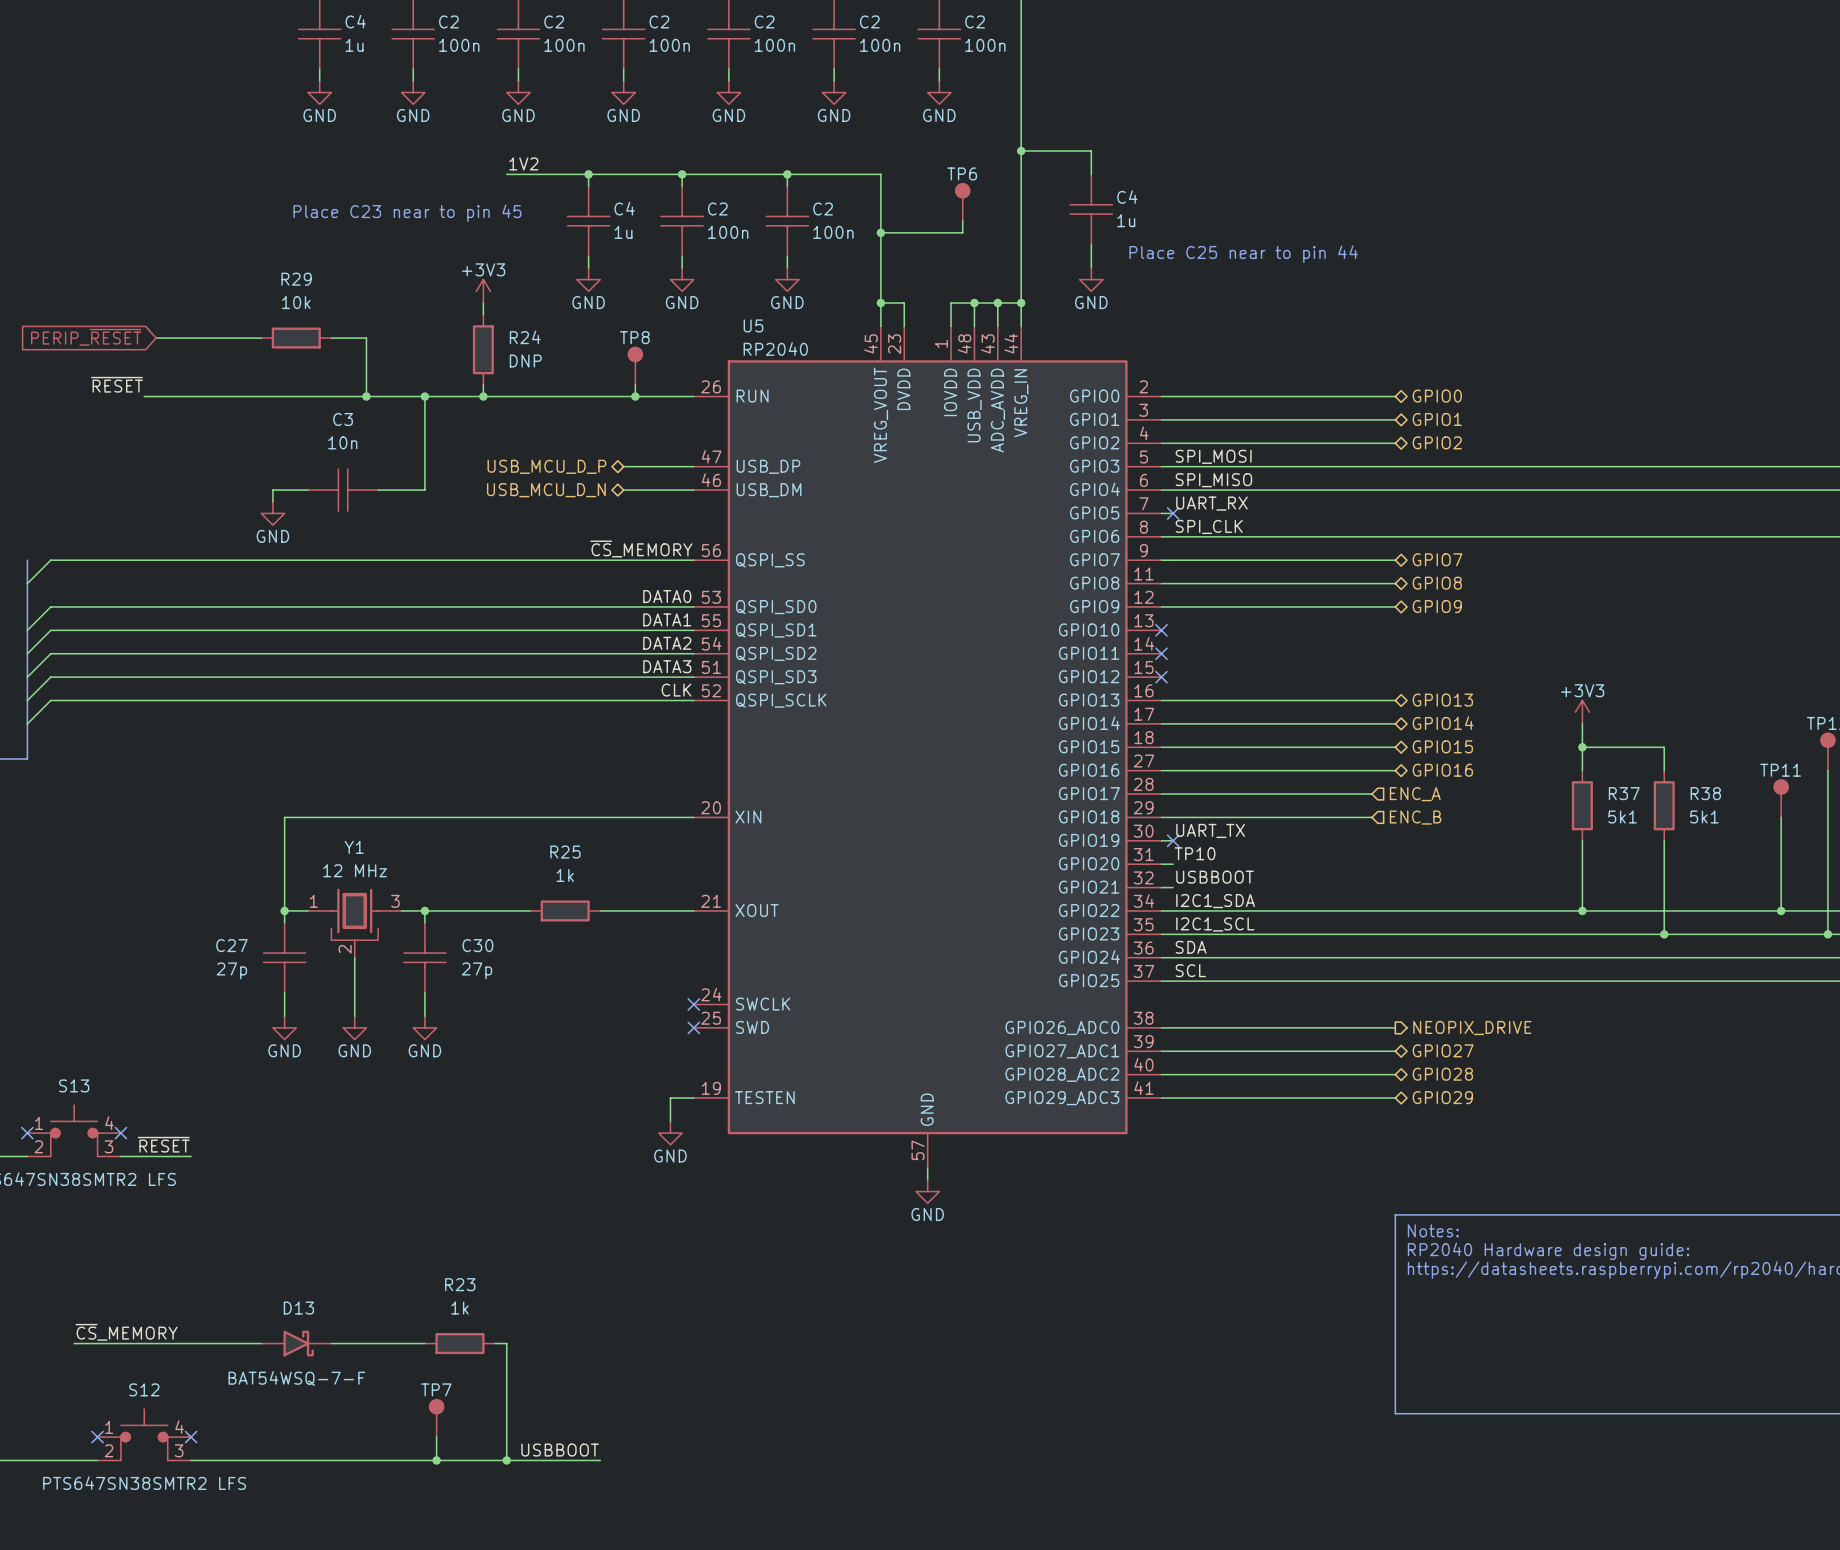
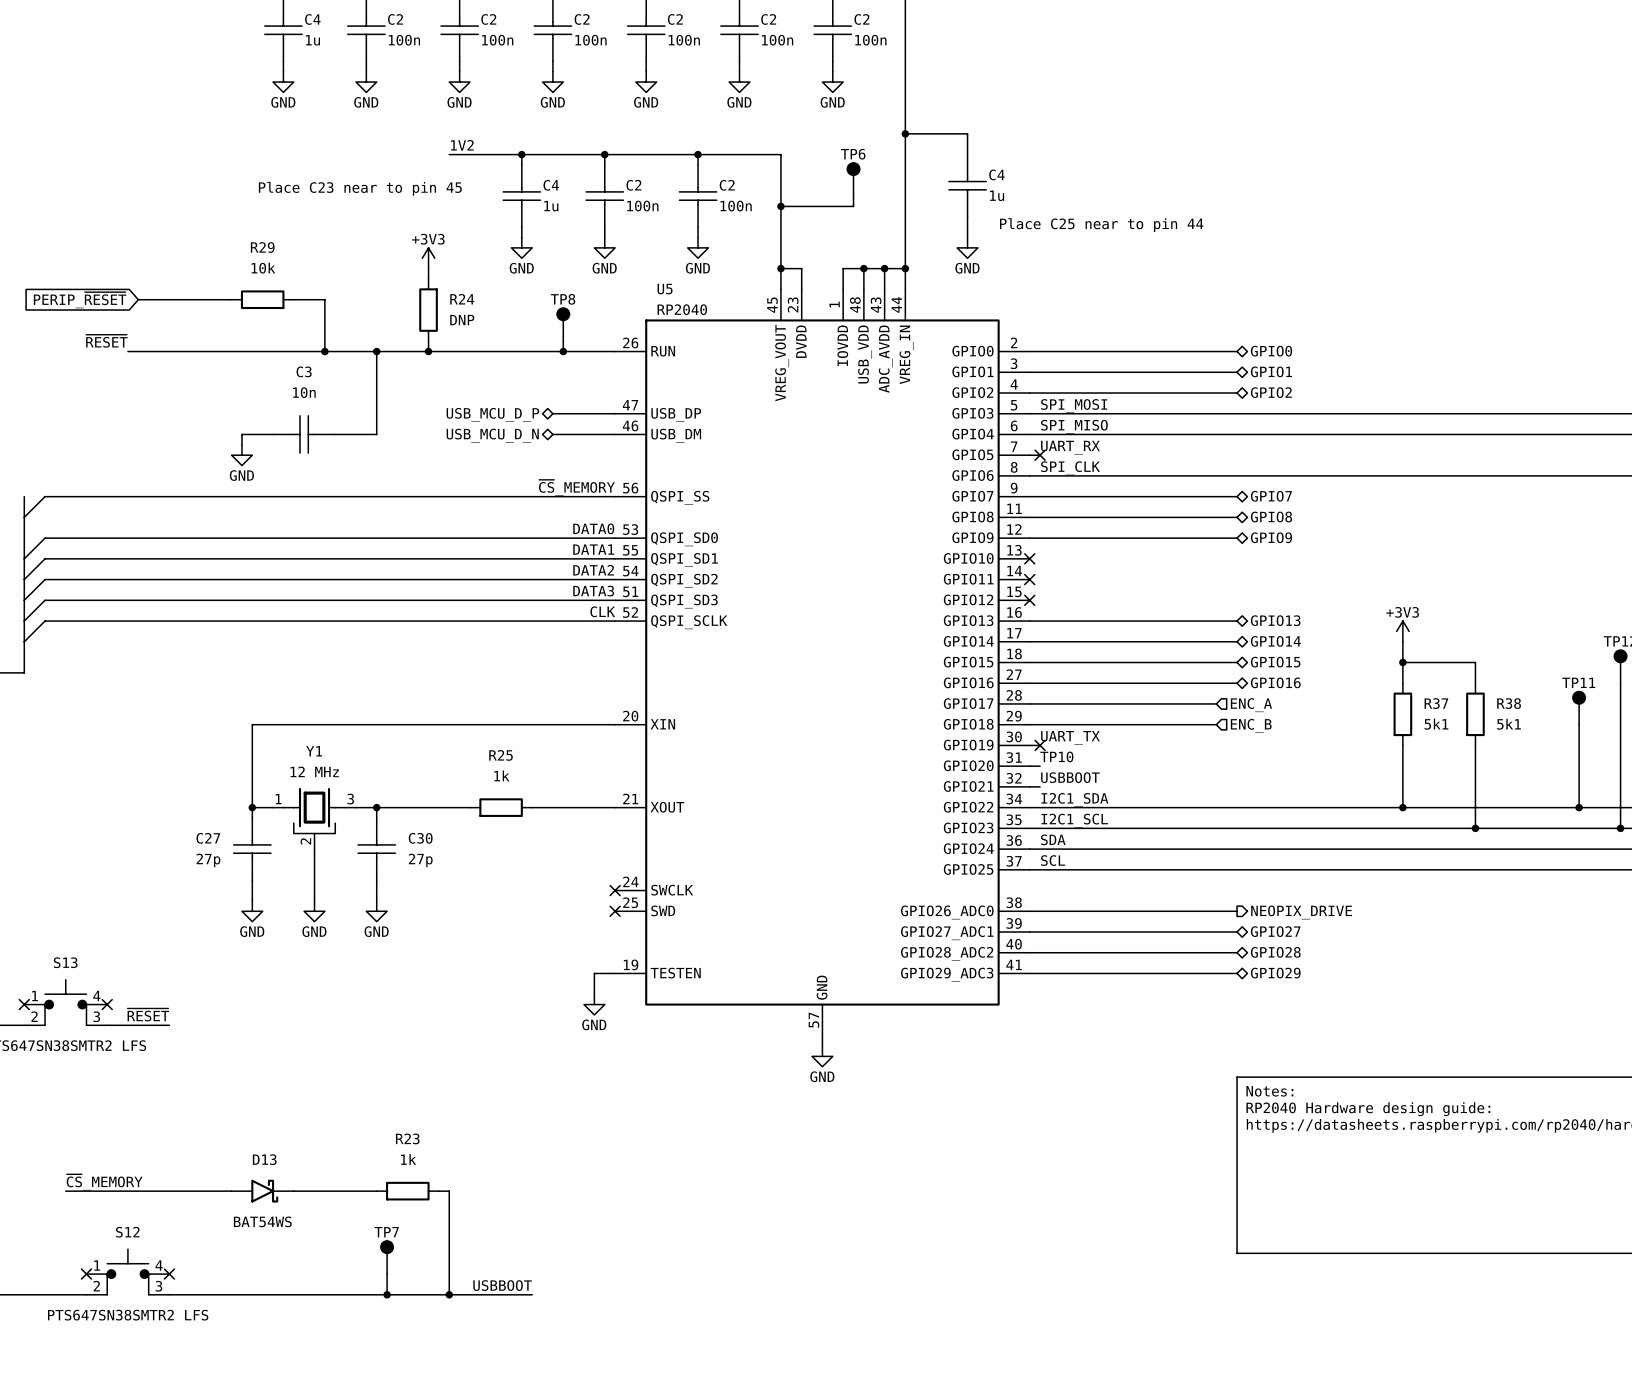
D13 value: BAT54WSQ-7-F (296, 1378) -> BAT54WS (262, 1221)

